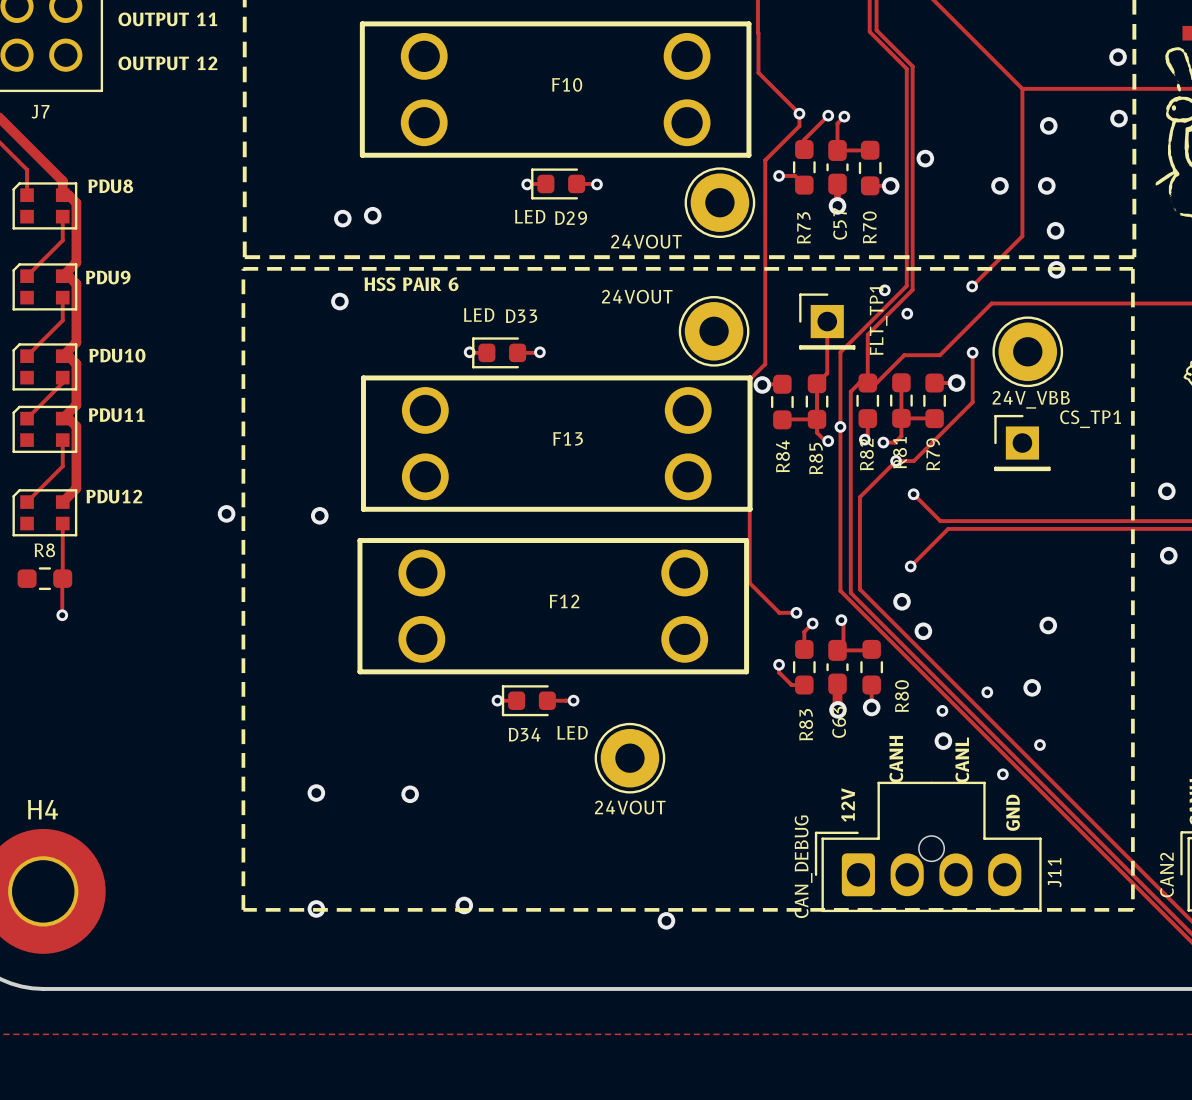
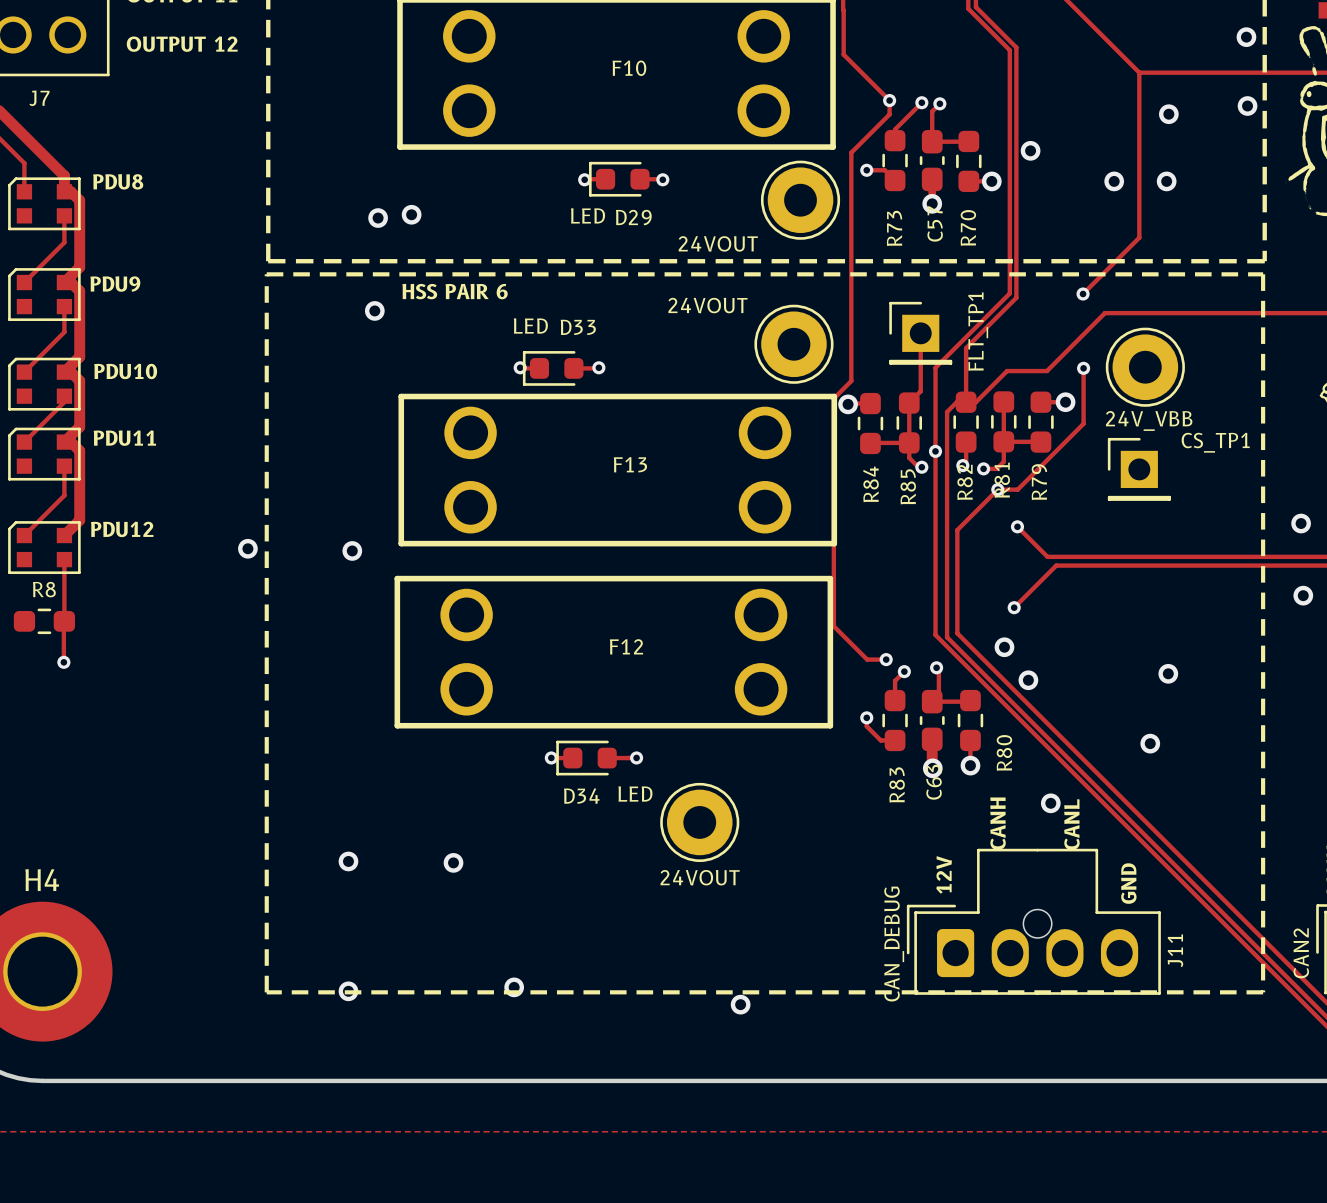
via: (1055, 230) -> none
via: (1056, 269) -> none
via: (884, 290) -> none
via: (907, 313) -> none
via: (987, 692) -> none
via: (942, 710) -> none
via: (1039, 745) -> none
via: (1002, 774) -> none

